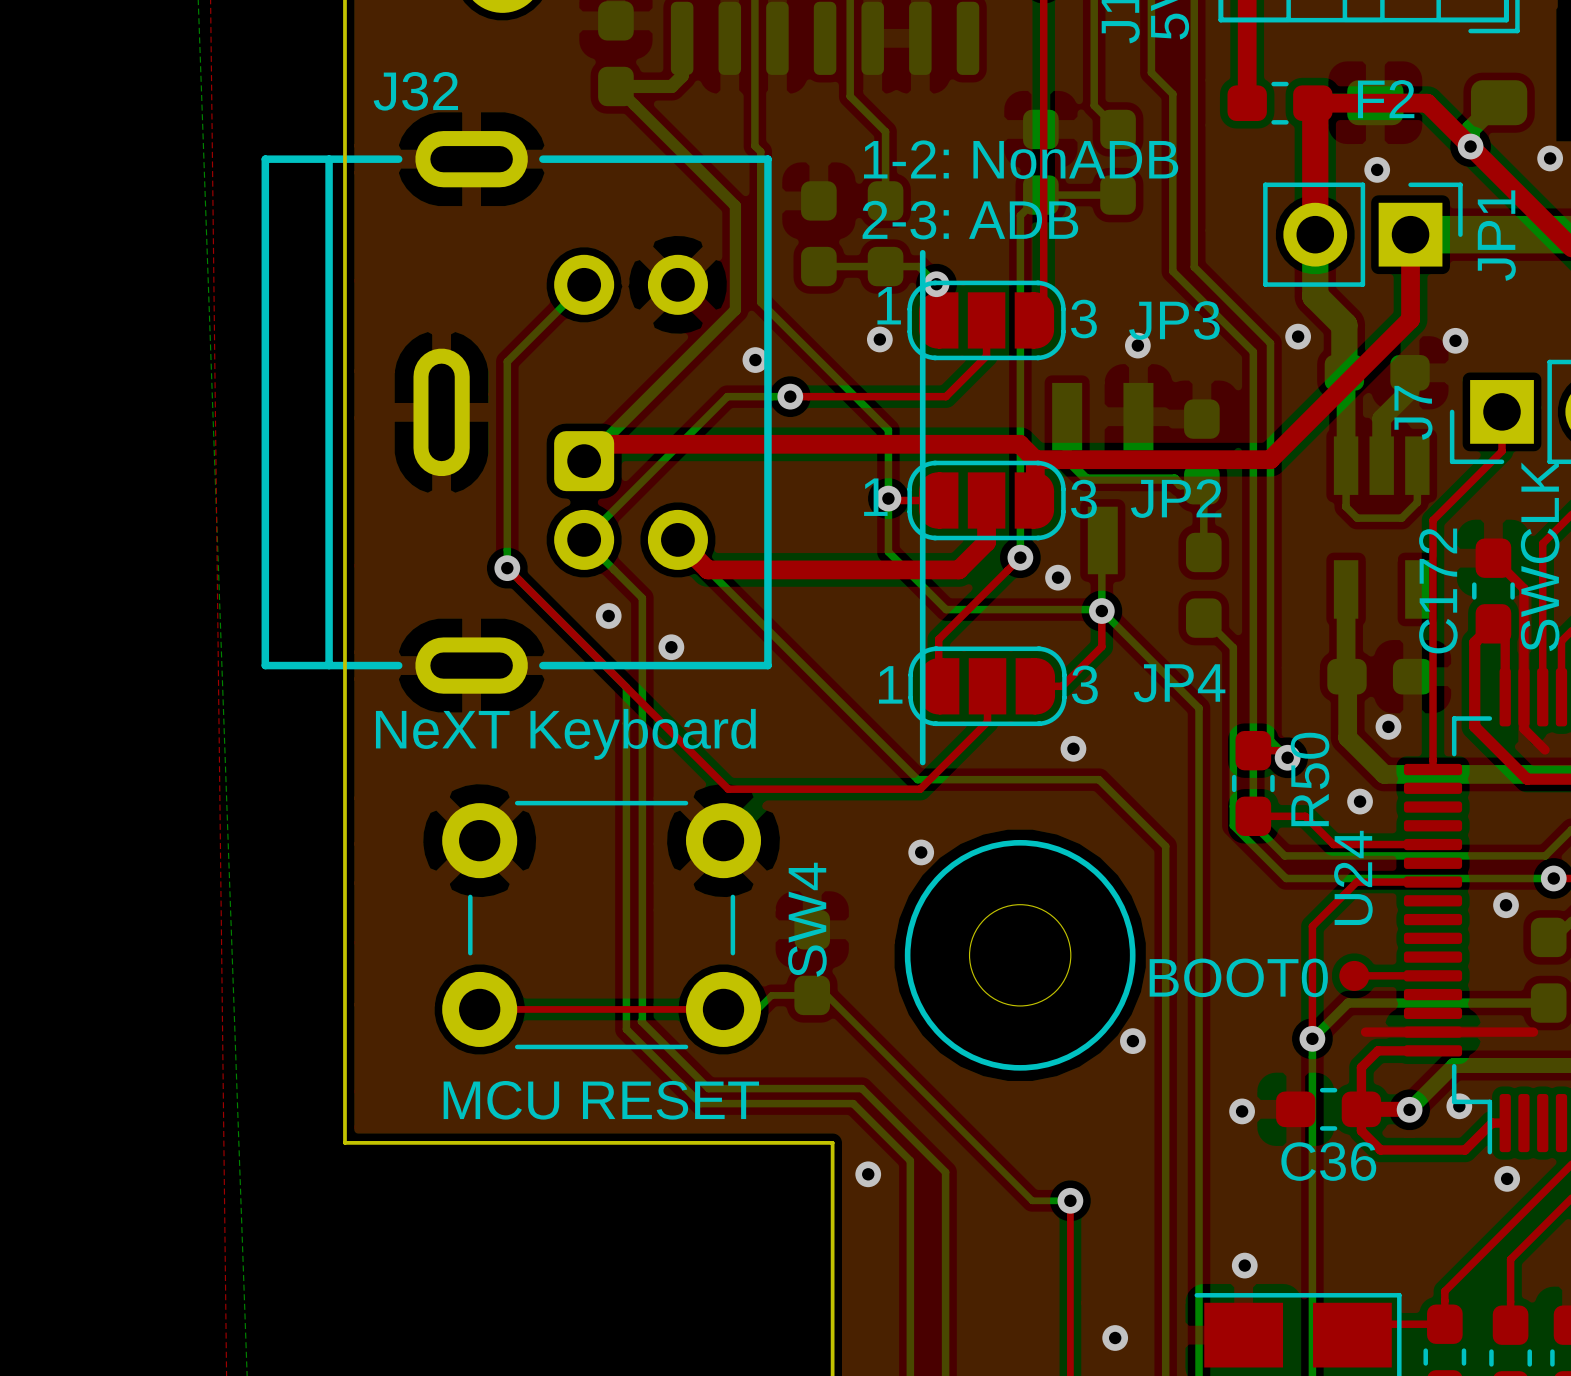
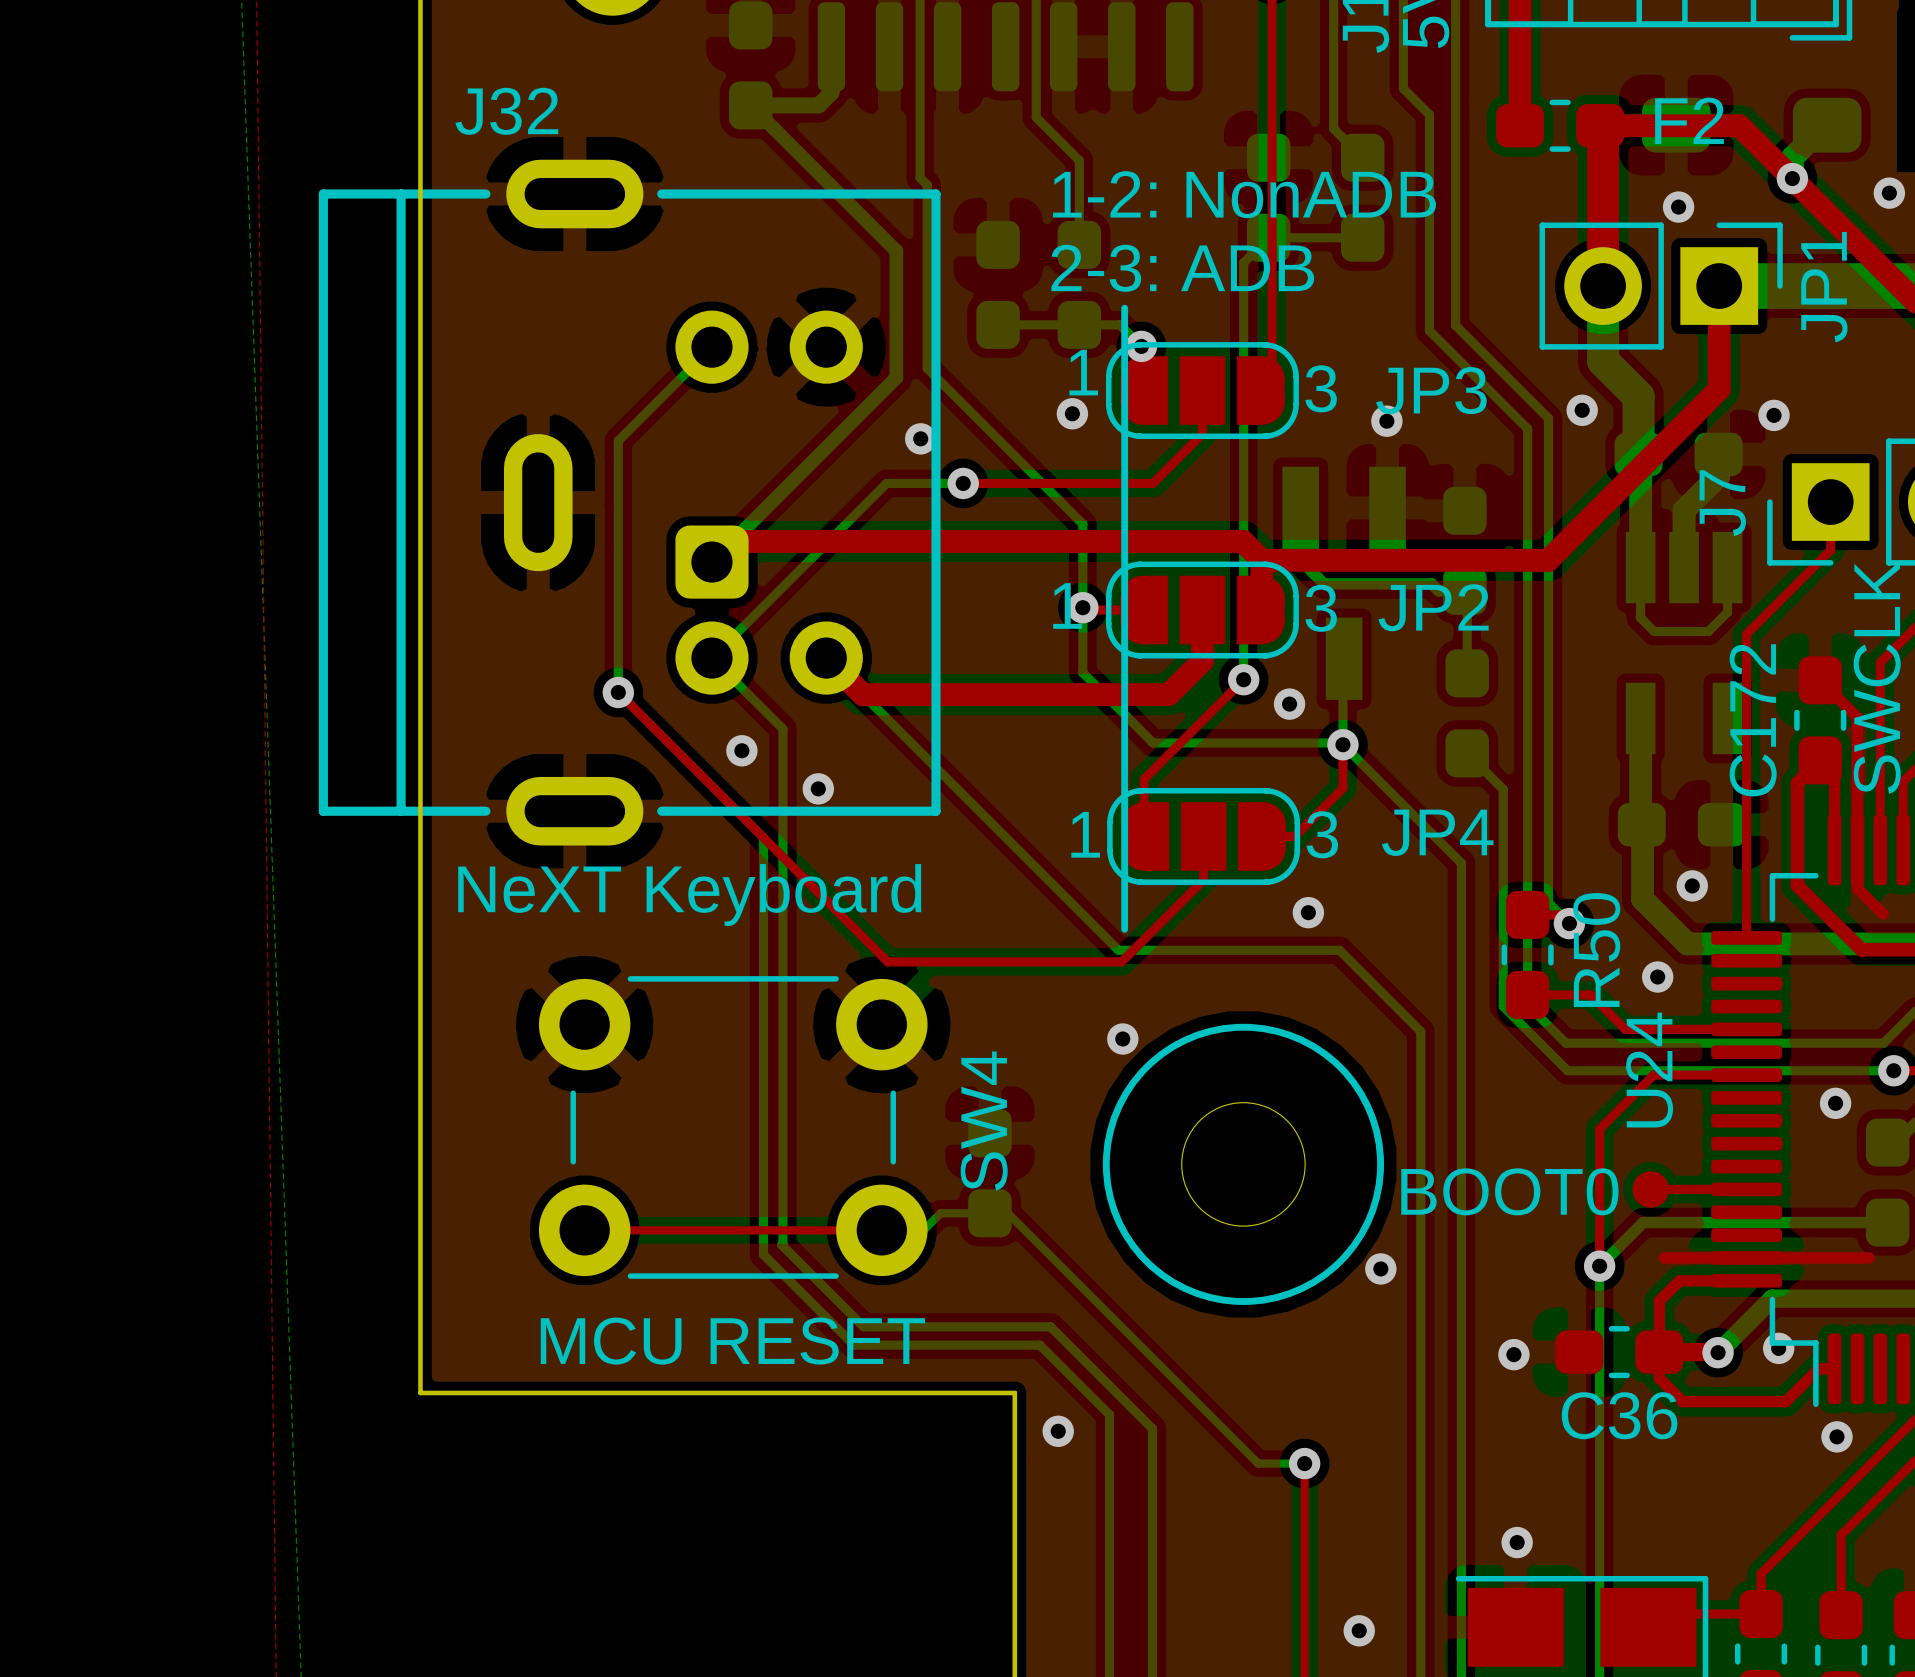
J32 footprint: [261, 131, 772, 694] -> [318, 159, 941, 846]

